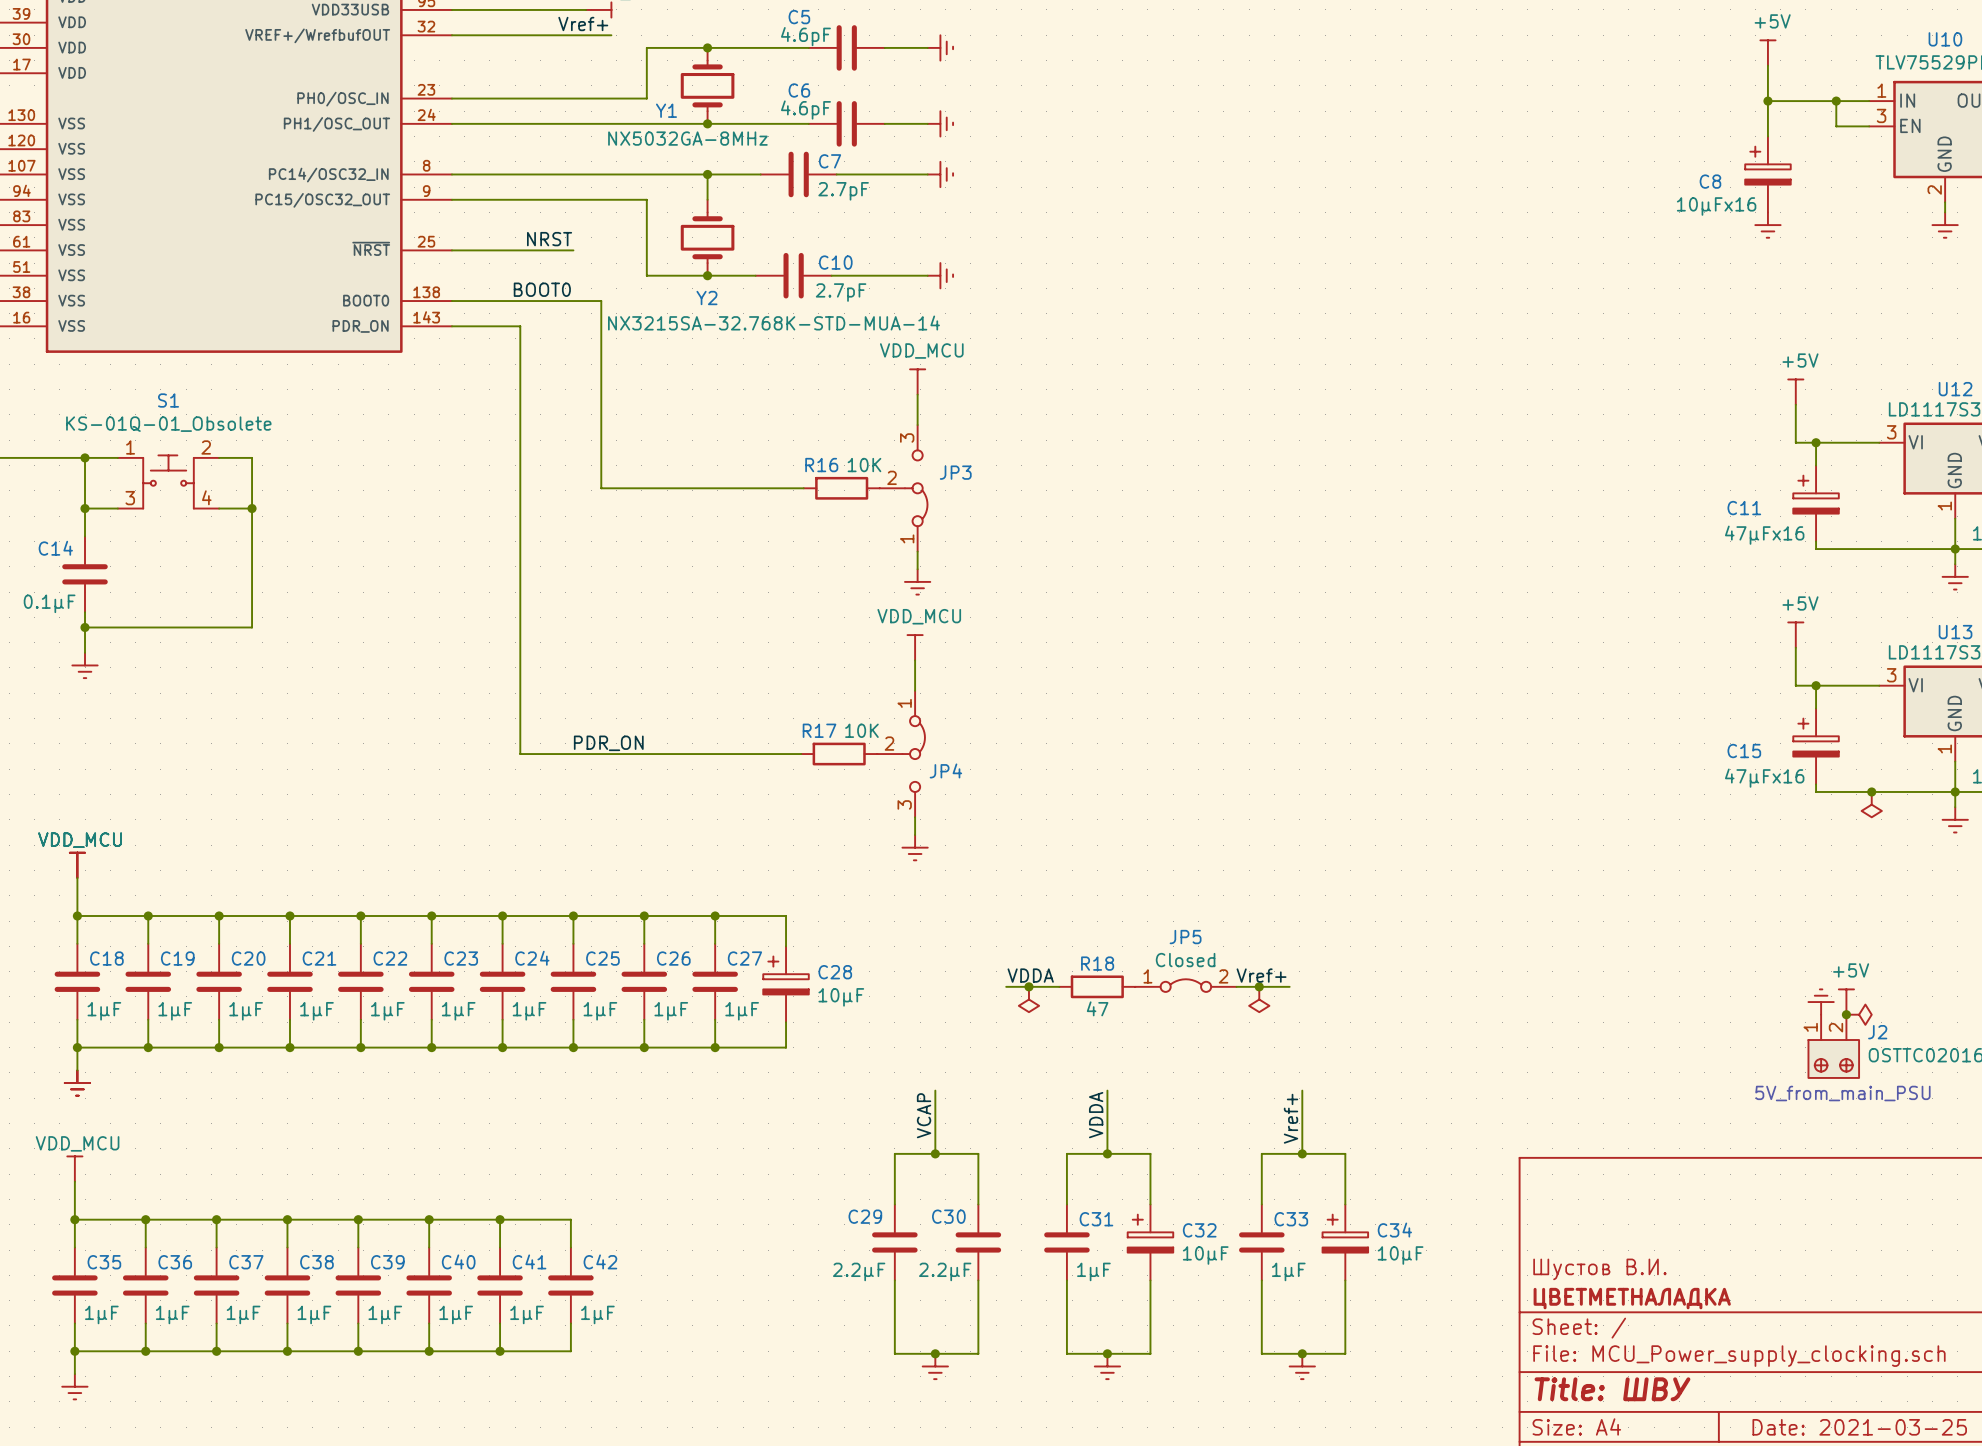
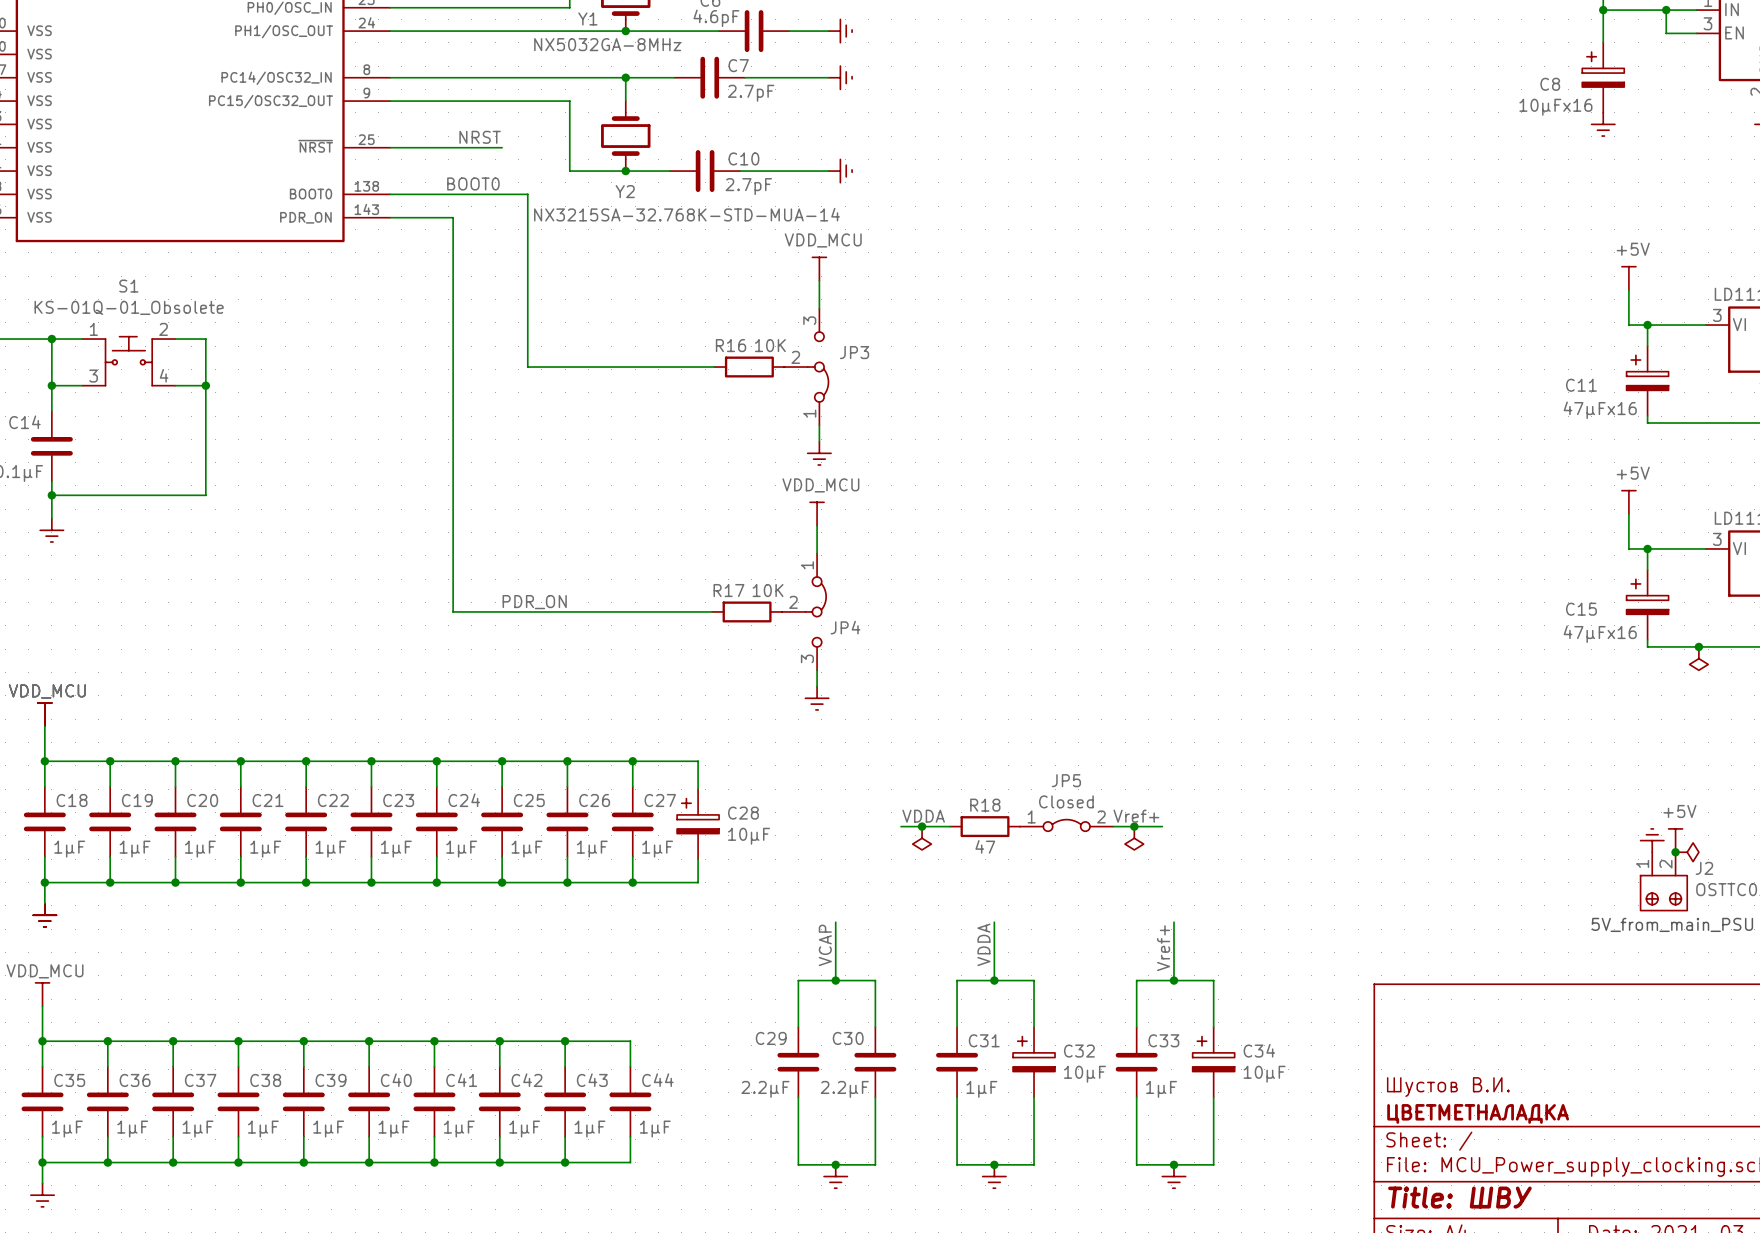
wire: none -> (499, 1041) (630, 1041) (630, 1066)
junction: none -> (499, 1041)
wire: none -> (565, 1041) (565, 1066)
junction: none -> (565, 1041)
C43: none -> 1µF (565, 1101)
C44: none -> 1µF (630, 1101)
wire: none -> (565, 1136) (565, 1162)
wire: none -> (630, 1136) (630, 1162) (499, 1162)
junction: none -> (499, 1162)
junction: none -> (565, 1162)

